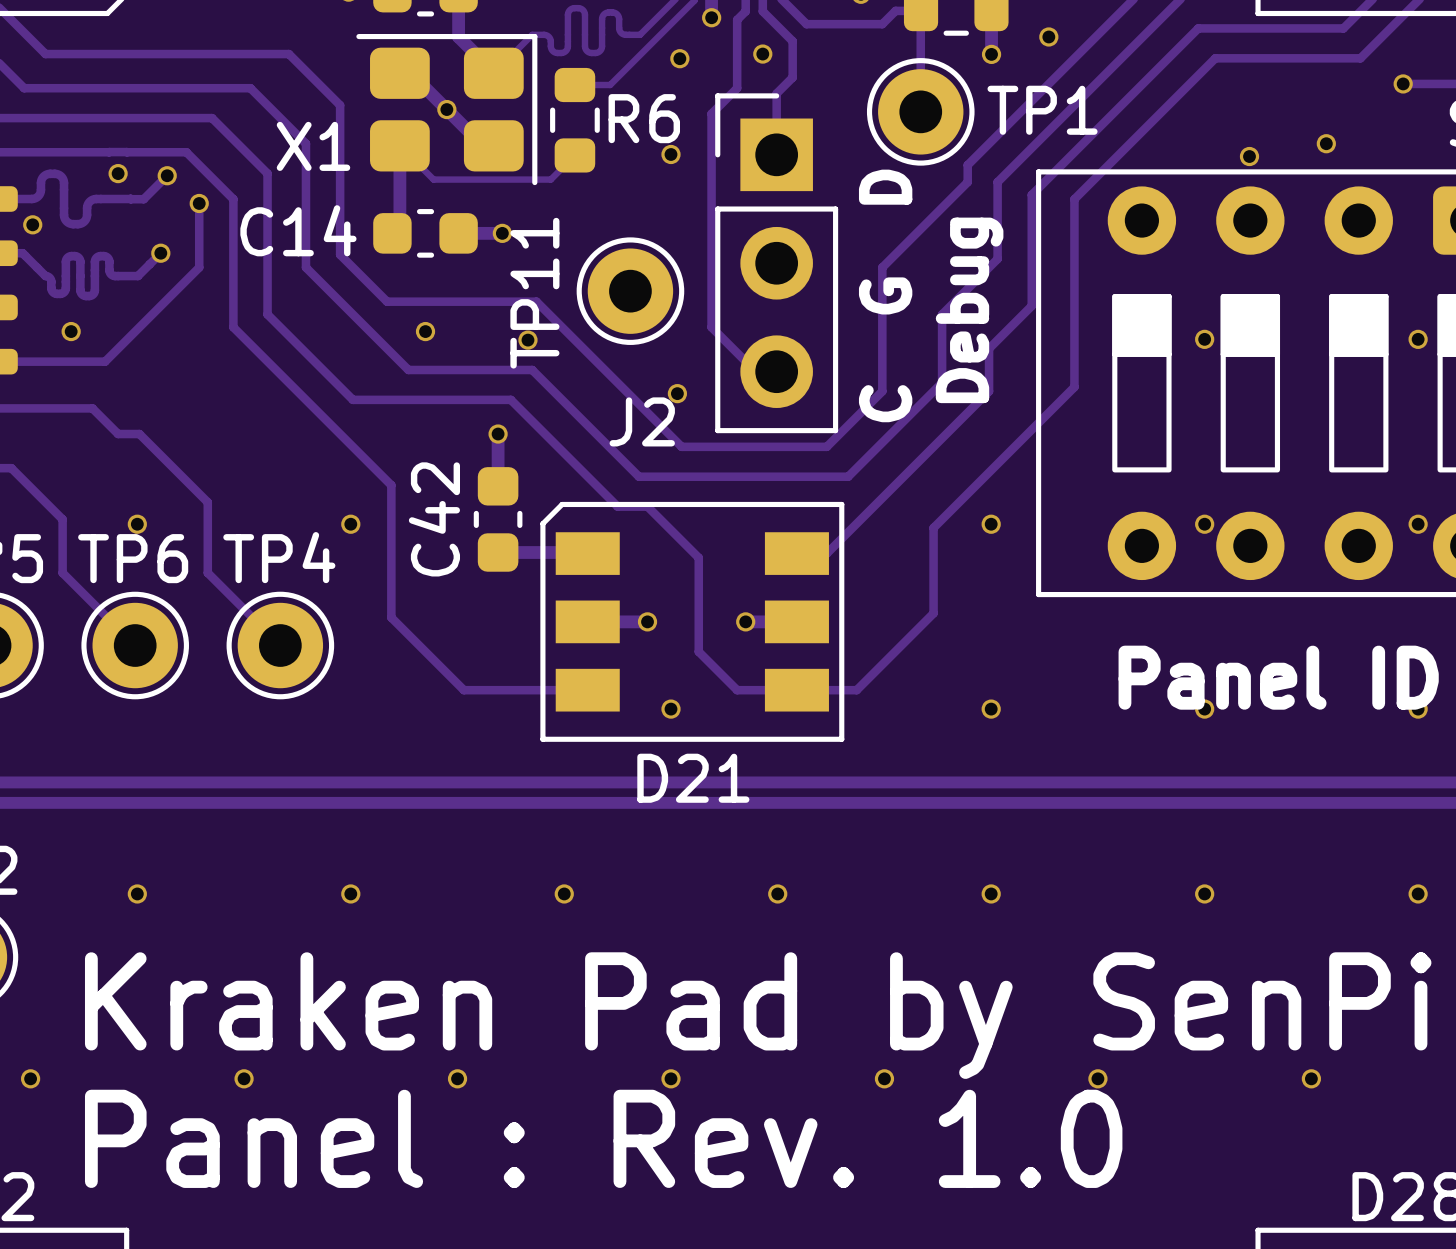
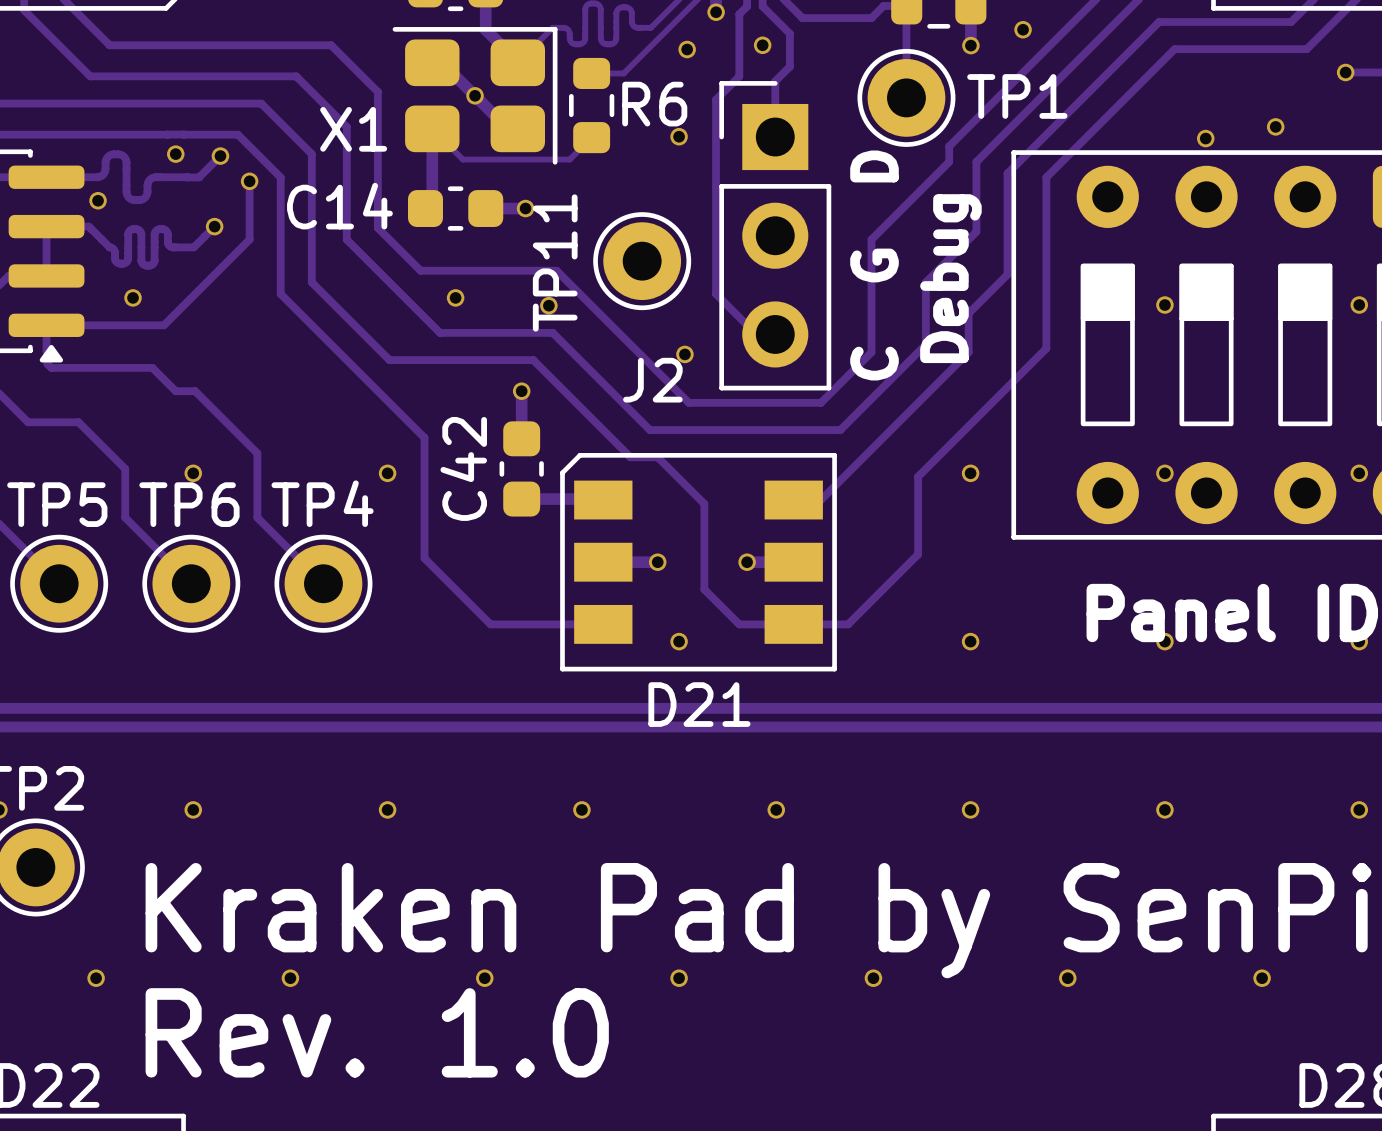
text: Panel : Rev. 1.0 (603, 1138) -> Rev. 1.0 (377, 1032)

